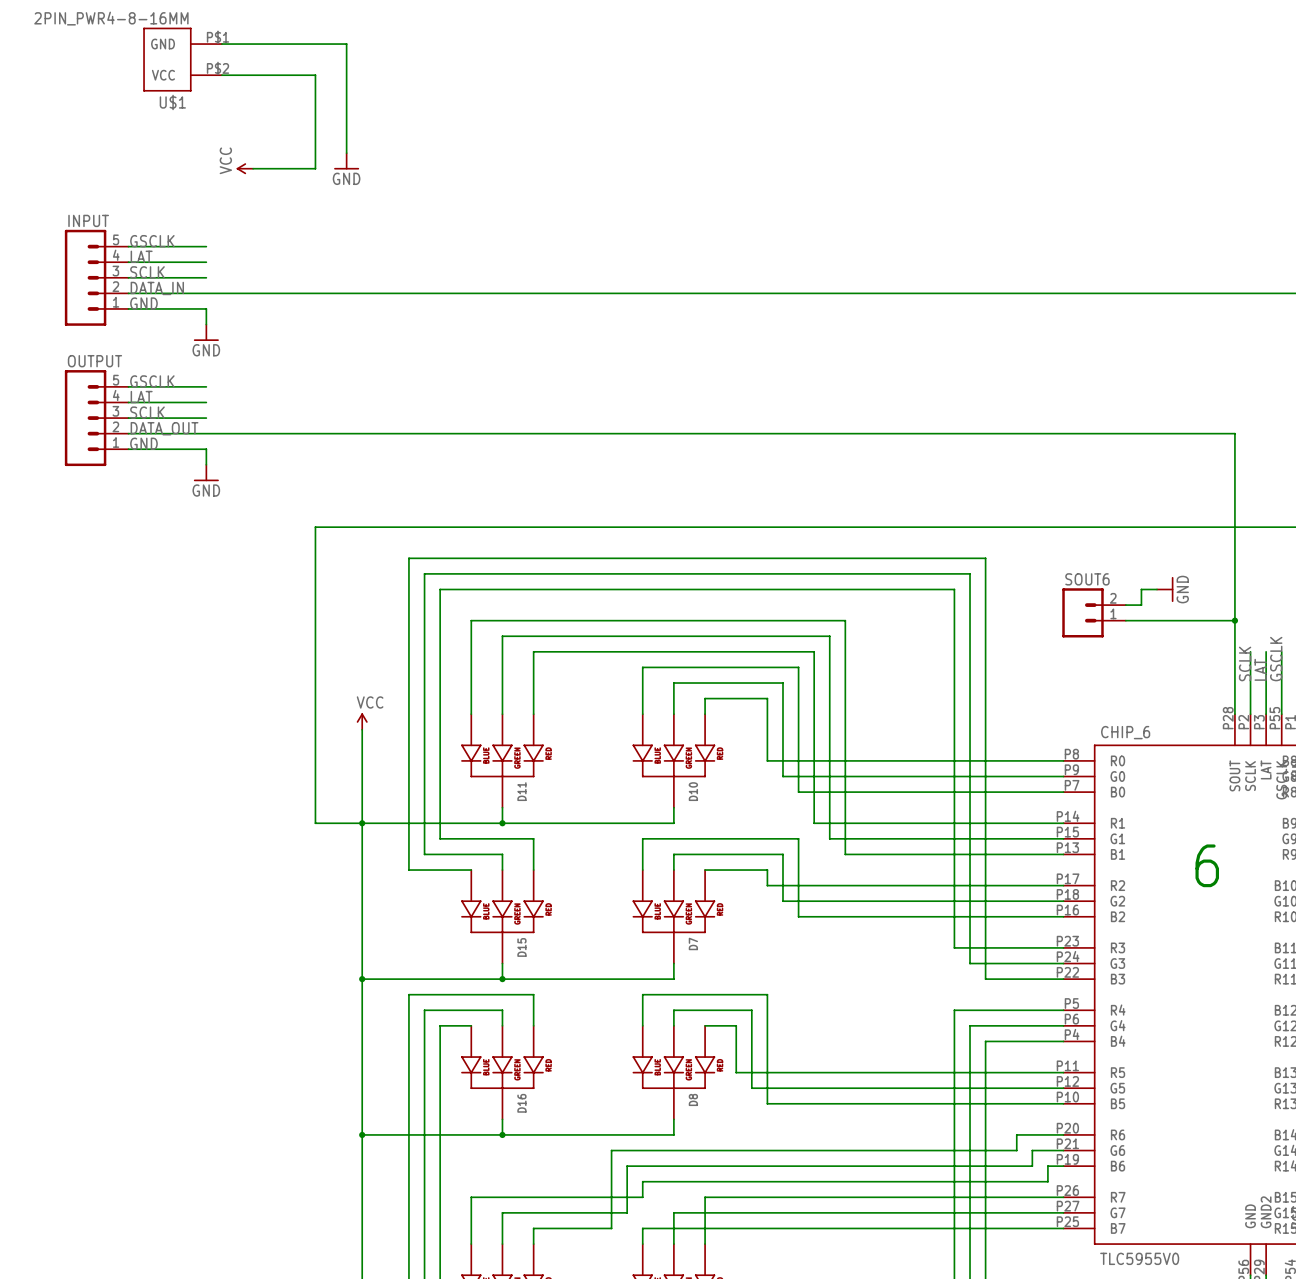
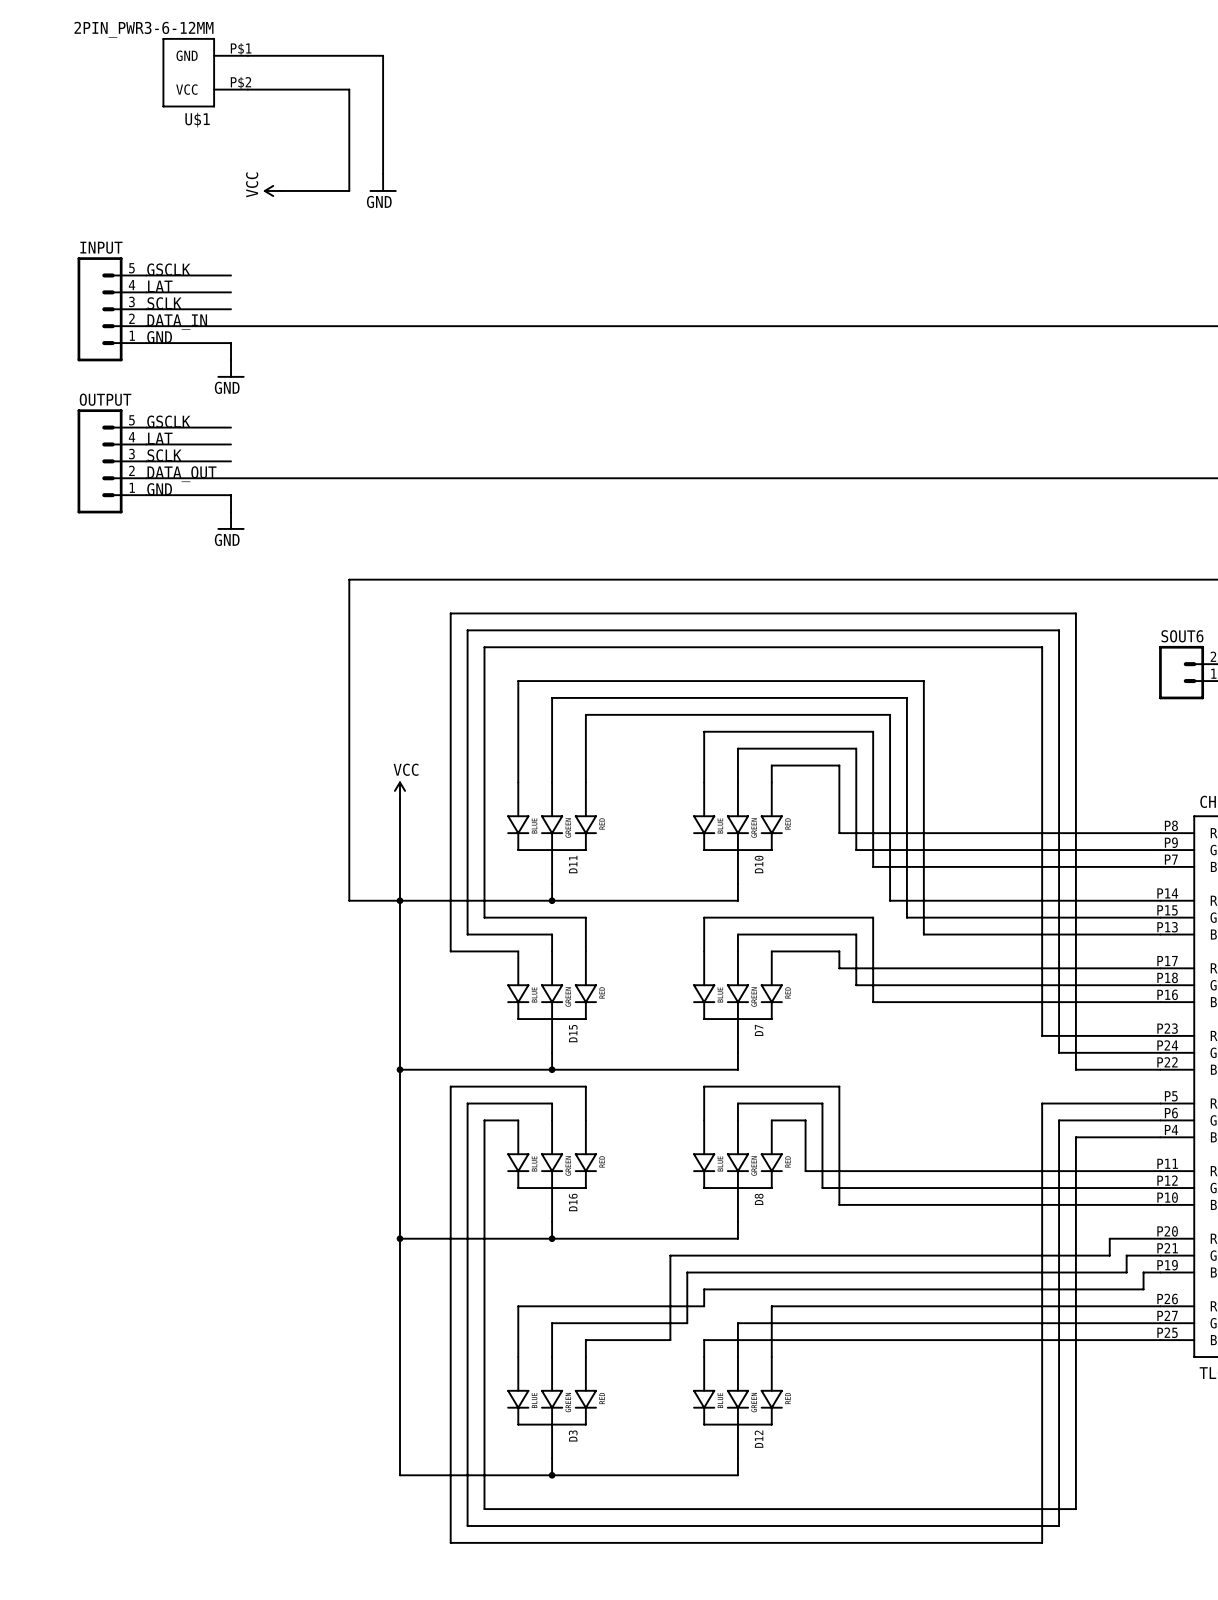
U$1 value: 2PIN_PWR4-8-16MM (111, 18) -> 2PIN_PWR3-6-12MM (144, 29)

